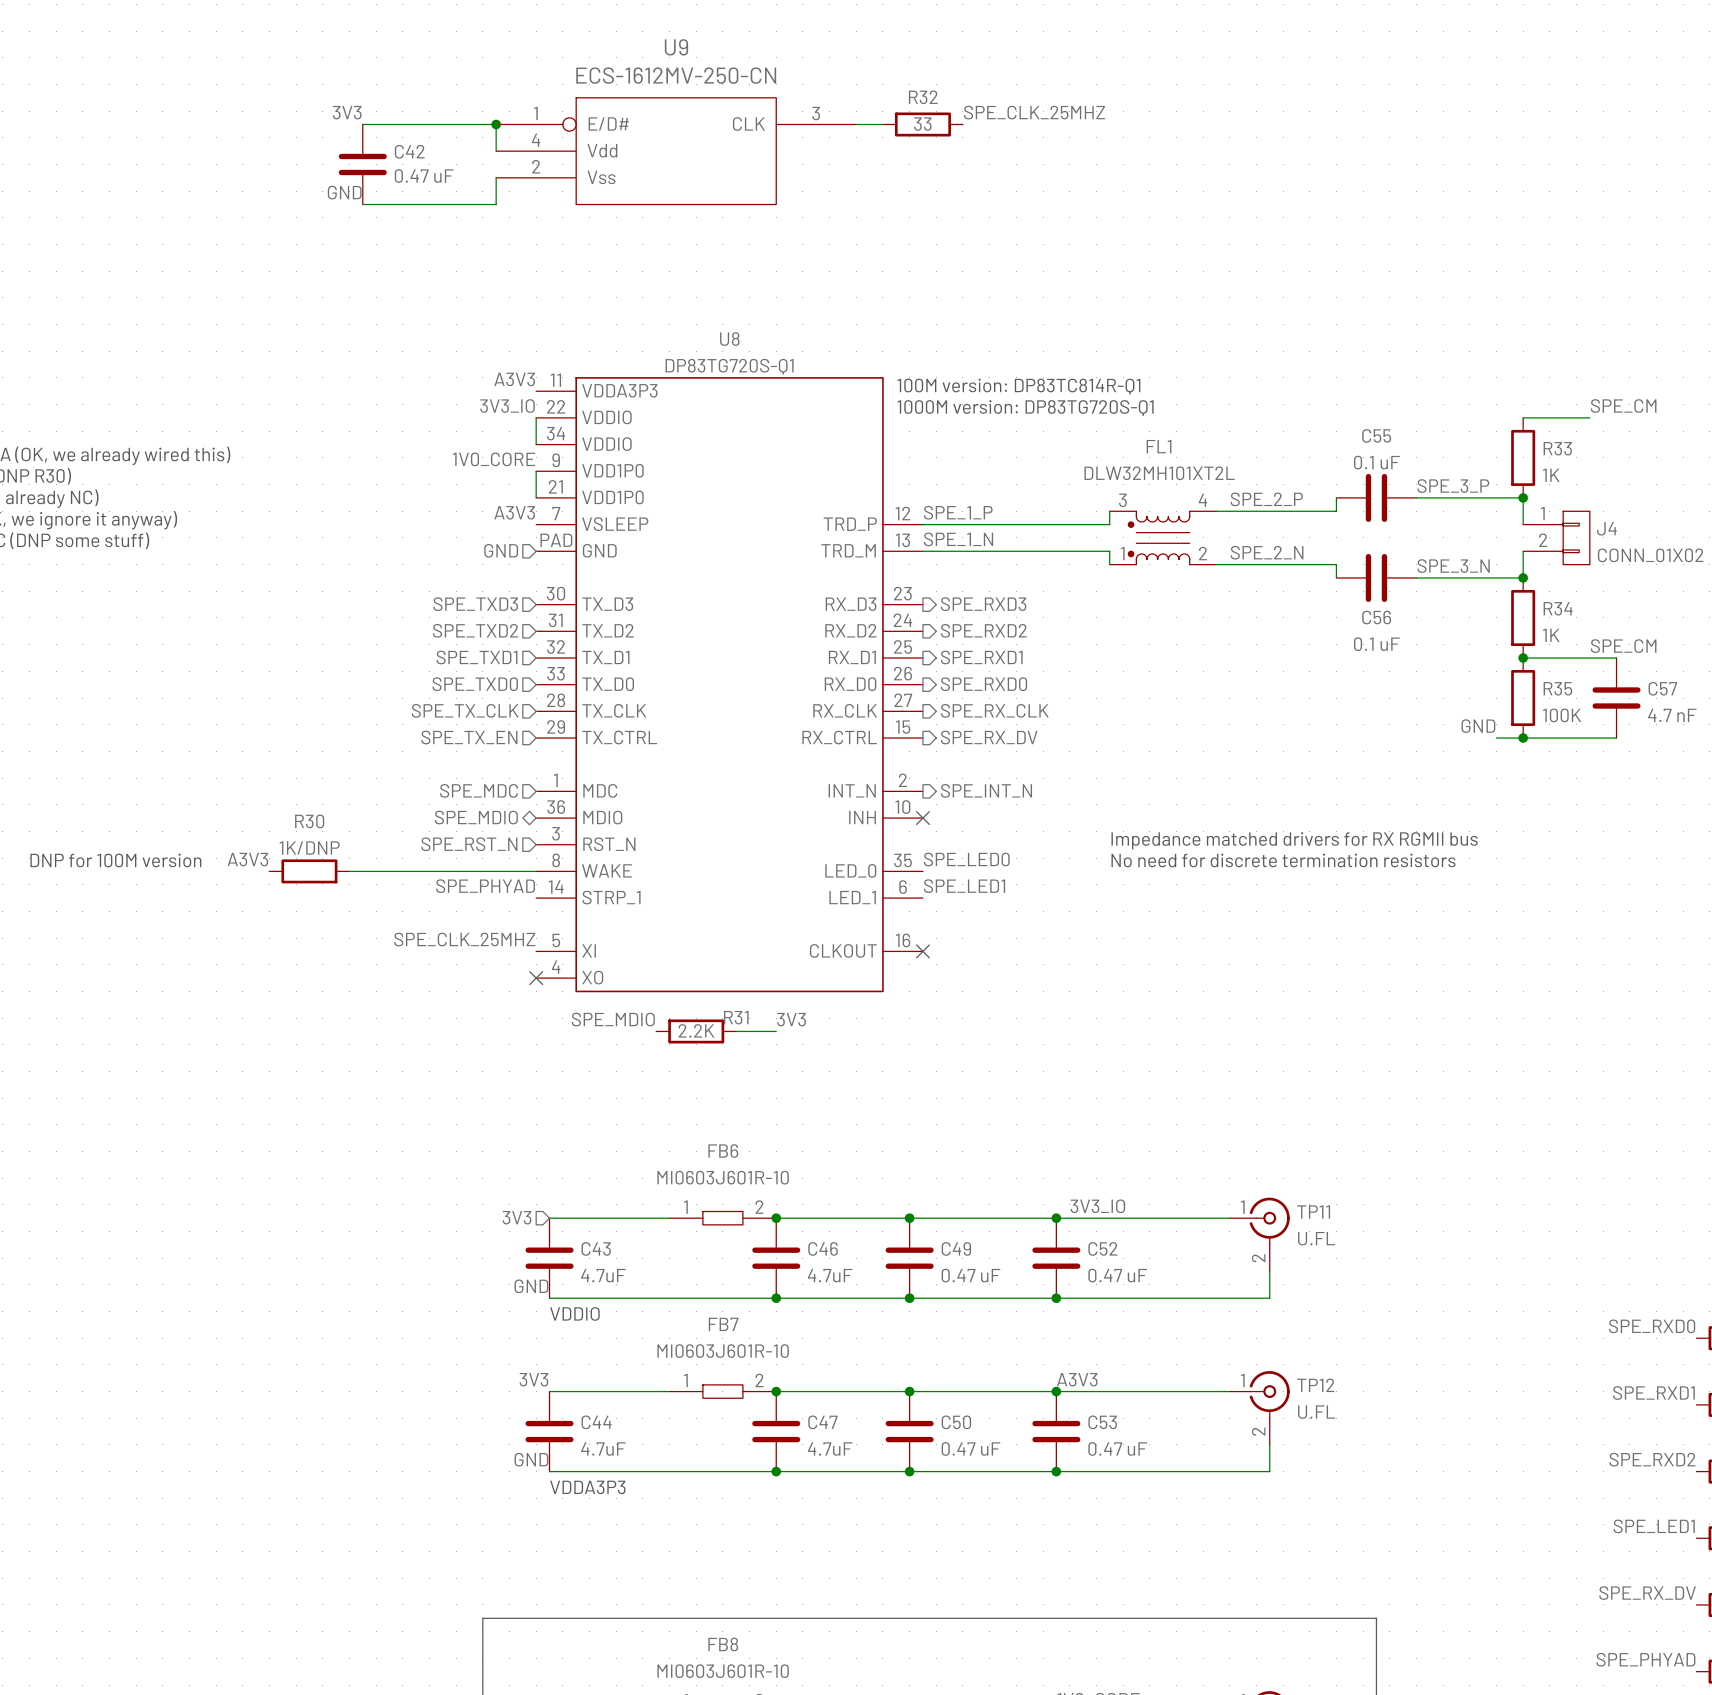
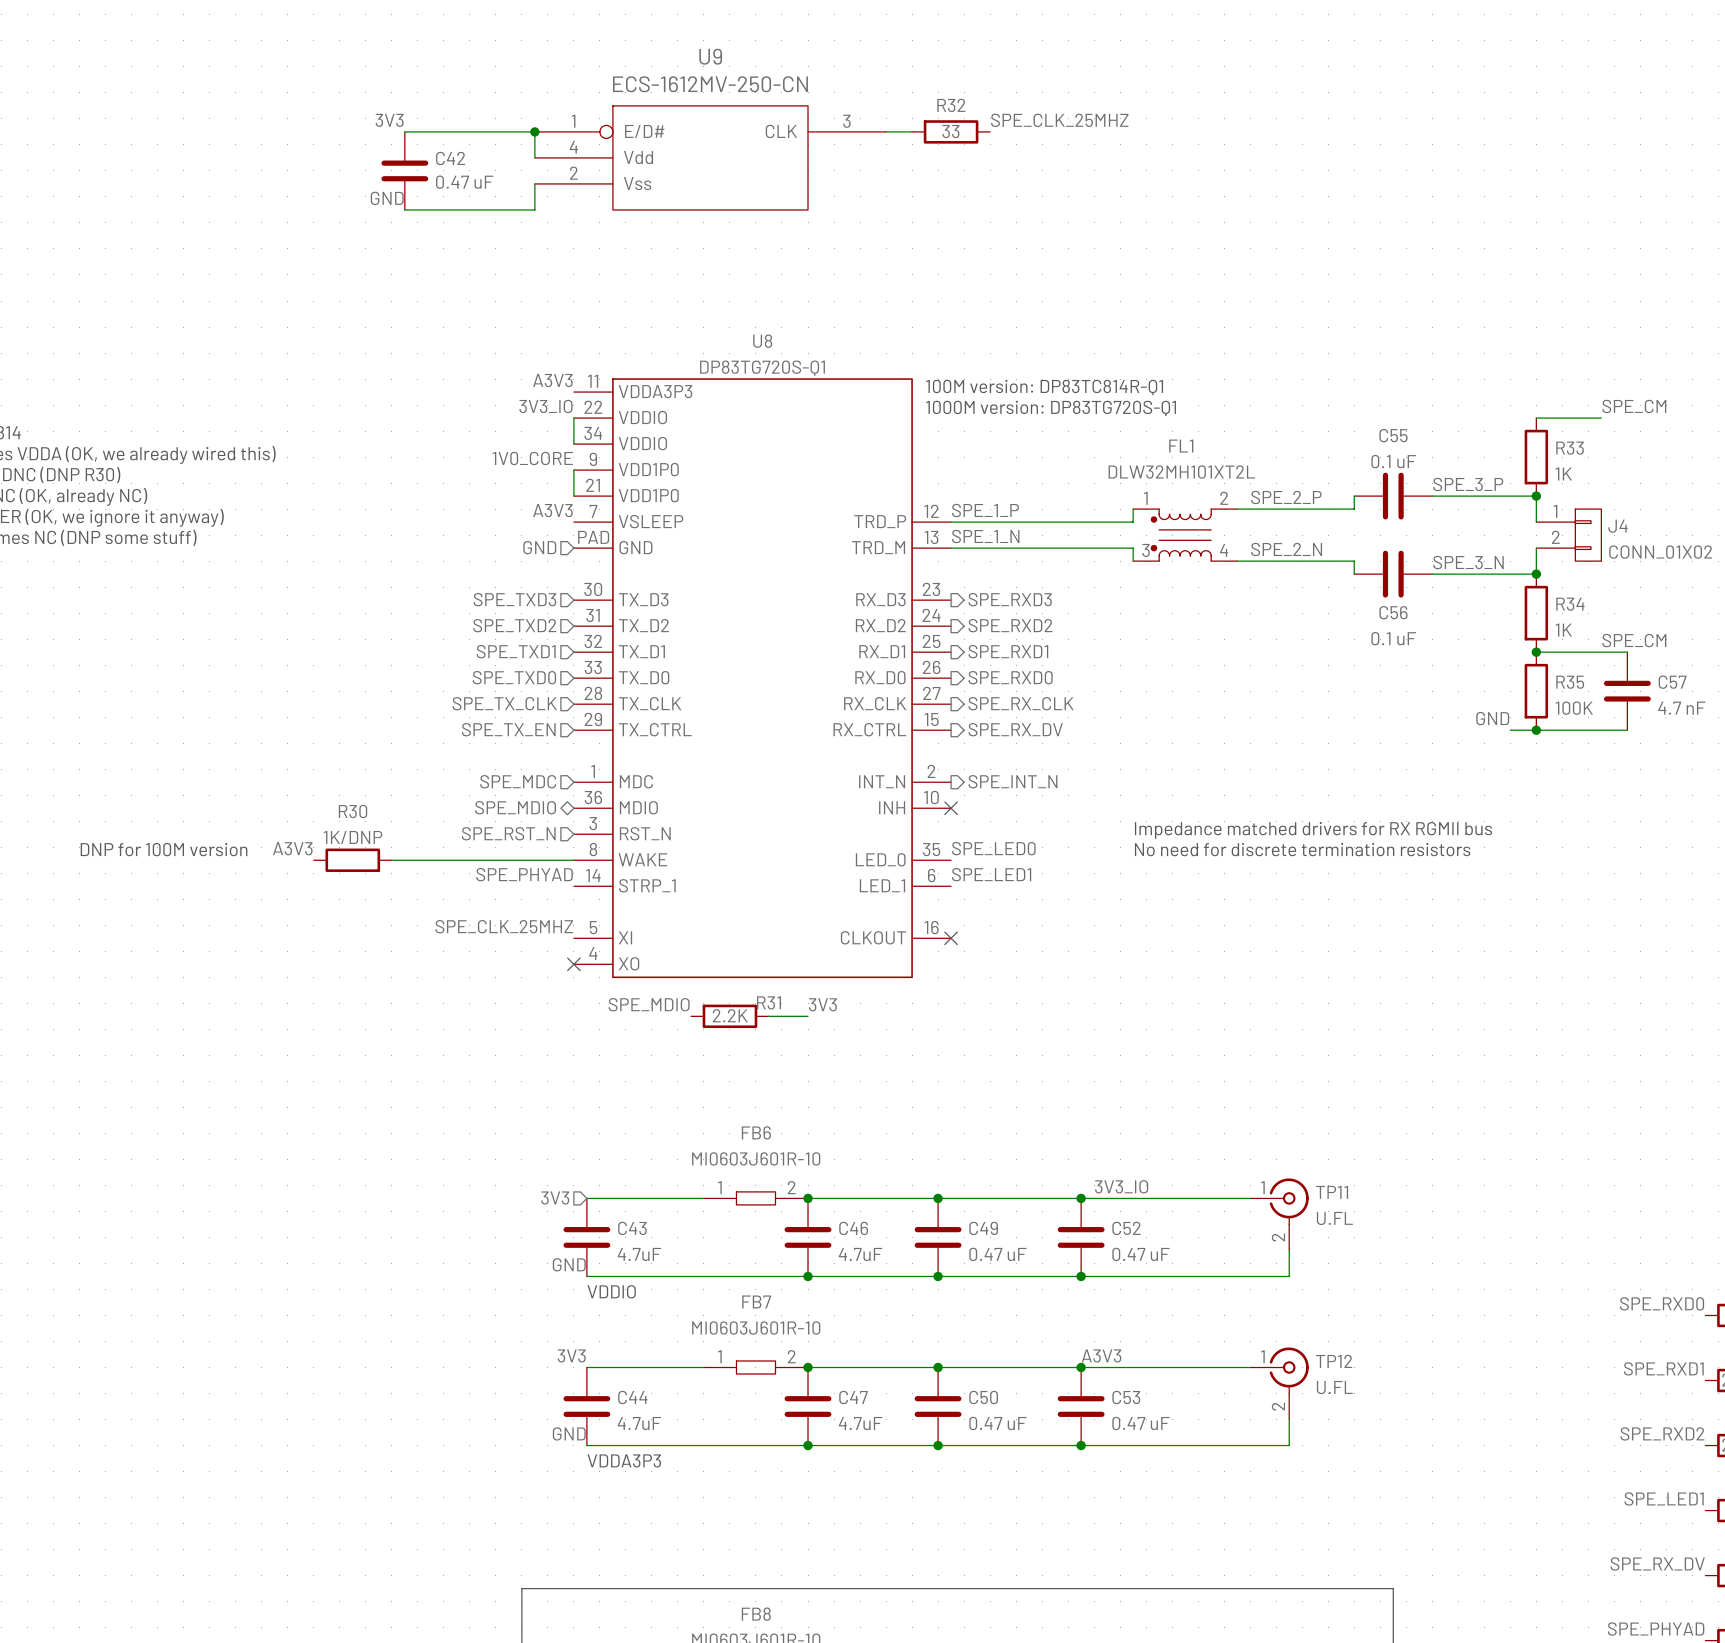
FL1 flip: as is (1159, 537) -> up-down (1181, 535)

